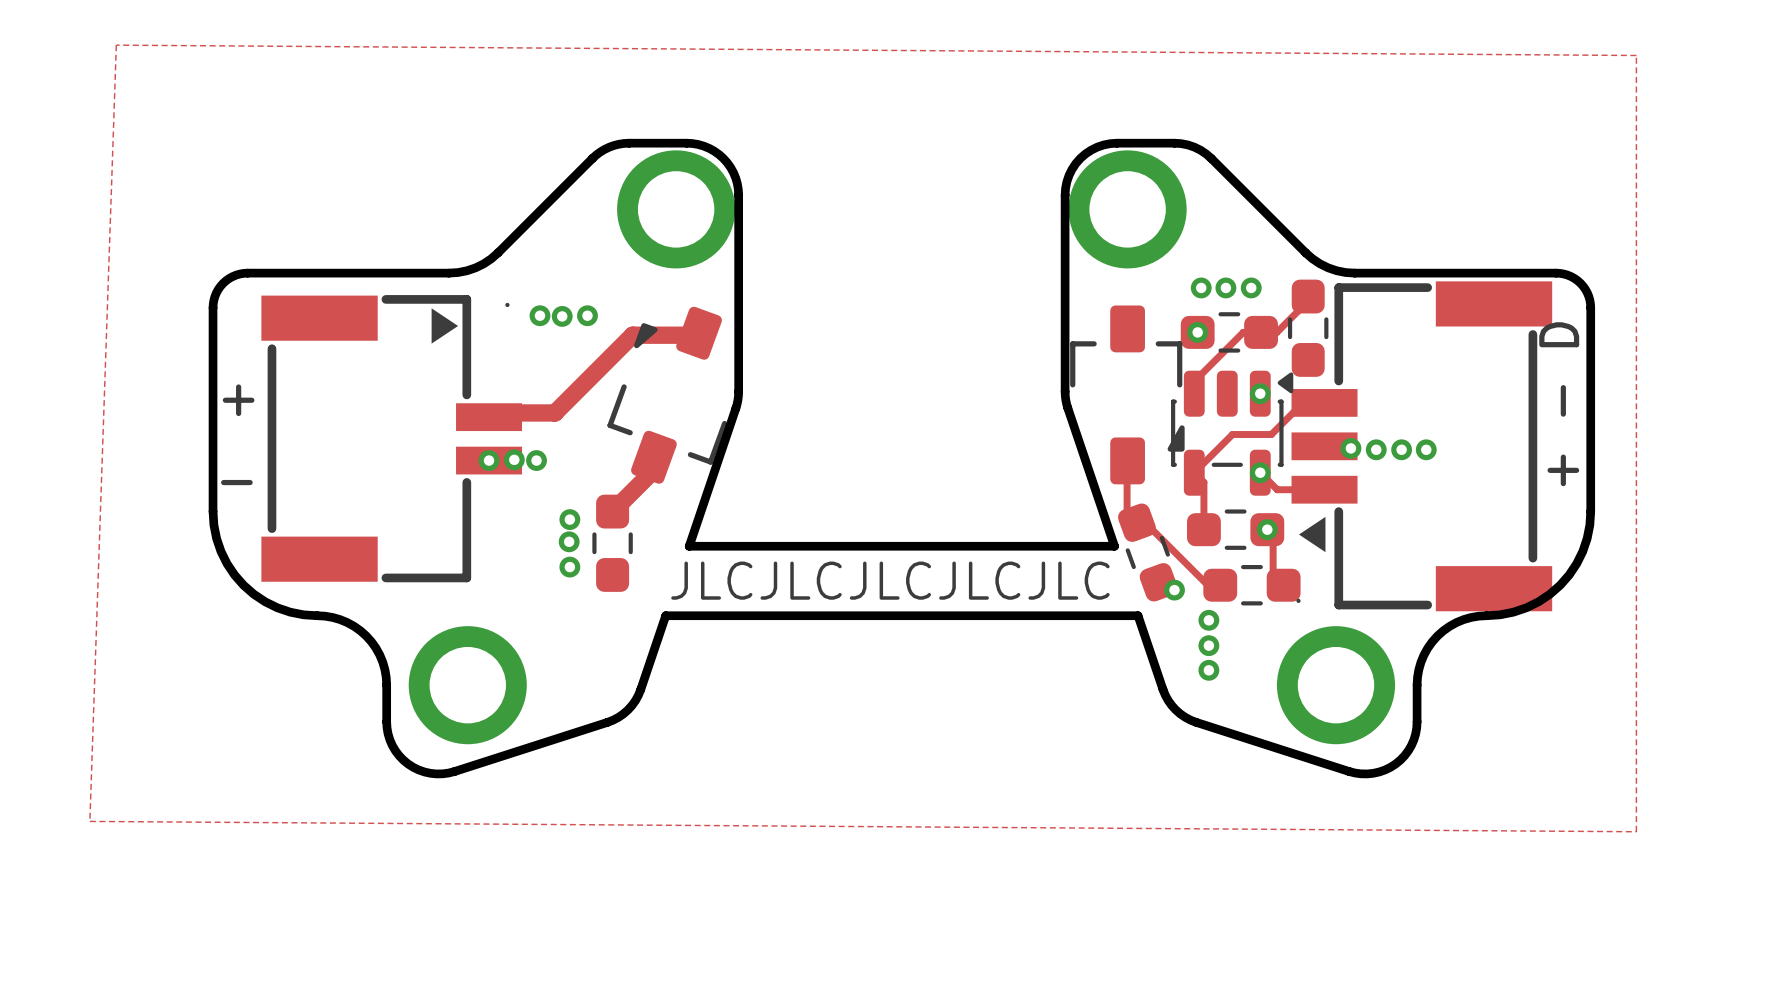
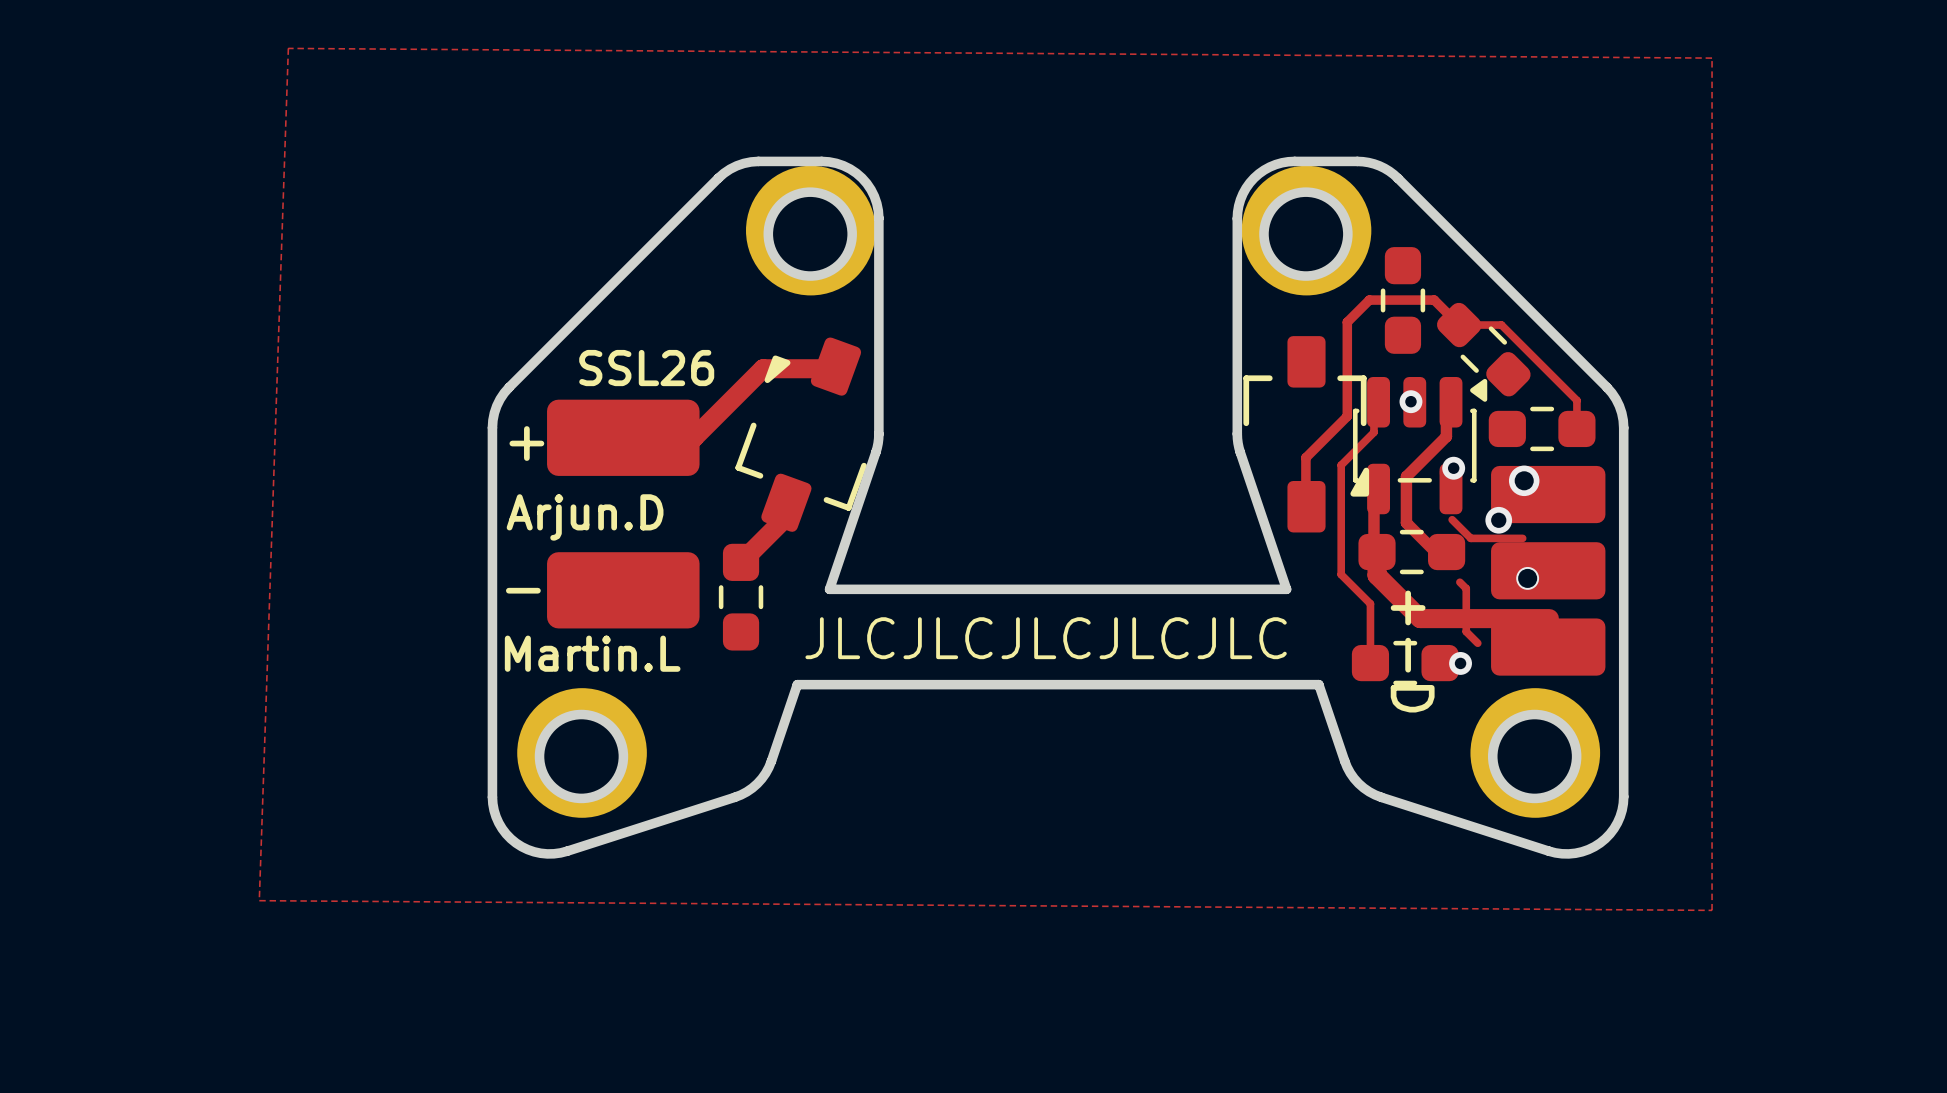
zone outline: (116, 45) (89, 821) (1636, 831) (1636, 55) (116, 45) -> (288, 48) (259, 900) (1712, 910) (1712, 58) (288, 48)
board edge: (629, 143) (692, 143) (709, 148) (723, 158) (730, 167) (738, 189) (737, 399) (689, 546) (1114, 546) (1065, 399) (1065, 188) (1069, 175) (1075, 163) (1085, 153) (1097, 147) (1117, 143) (1174, 143) (1194, 147) (1206, 153) (1305, 252) (1328, 267) (1354, 273) (1559, 273) (1571, 276) (1580, 283) (1588, 296) (1590, 307) (1590, 511) (1589, 525) (1582, 551) (1569, 574) (1560, 585) (1538, 601) (1513, 612) (1463, 619) (1449, 626) (1437, 636) (1423, 655) (1418, 669) (1416, 727) (1411, 745) (1395, 763) (1373, 773) (1349, 771) (1185, 717) (1175, 709) (1165, 695) (1138, 615) (665, 615) (638, 695) (627, 709) (618, 717) (454, 771) (436, 773) (418, 769) (403, 760) (389, 739) (387, 727) (384, 669) (376, 648) (366, 636) (354, 626) (340, 619) (290, 612) (265, 601) (243, 585) (226, 563) (220, 551) (216, 538) (213, 511) (213, 307) (214, 296) (226, 280) (243, 273) (449, 273) (475, 267) (498, 252) (596, 155) (614, 145) (629, 143) -> (758, 161) (736, 165) (718, 178) (509, 387) (496, 405) (492, 427) (492, 797) (494, 810) (498, 822) (506, 834) (516, 843) (534, 851) (547, 853) (560, 852) (746, 791) (761, 778) (768, 767) (797, 684) (1318, 684) (1347, 767) (1358, 783) (1375, 794) (1555, 852) (1568, 853) (1582, 851) (1600, 843) (1610, 833) (1620, 816) (1623, 796) (1623, 427) (1621, 413) (1616, 399) (1606, 387) (1393, 174) (1379, 165) (1362, 161) (1281, 162) (1269, 166) (1254, 178) (1246, 188) (1238, 205) (1238, 443) (1286, 589) (829, 589) (878, 443) (878, 210) (874, 196) (866, 183) (856, 173) (843, 165) (821, 161) (758, 161)
round board edge: none -> [763, 187, 857, 281]
round board edge: none -> [1259, 187, 1353, 281]
via: (1201, 287) -> none
via: (1225, 287) -> none
via: (1251, 287) -> none
track: (1307, 301) (1276, 332) (1243, 332) (1194, 381) (1194, 393) -> none
via: (539, 315) -> none
via: (587, 315) -> none
via: (562, 316) -> none
part rotation: 0° (1308, 328) -> 45° counterclockwise (1483, 349)
via: (1197, 332) -> none
part rotation: 0° (1229, 332) -> 90° clockwise (1402, 300)
part position: (1229, 332) -> (1402, 300)
text: none -> SSL26 (646, 368)
track: none -> (1373, 402) (1373, 432) (1341, 465) (1341, 574) (1370, 603) (1370, 663)
via: none -> (1410, 401)
track: none -> (1446, 421) (1451, 416) (1451, 407) (1446, 402) (1446, 436) (1406, 476) (1406, 522) (1435, 552) (1446, 552)
part: none -> (1542, 428)
via: (1260, 393) -> none
text position: + (238, 400) -> + (526, 443)
track: (1324, 402) (1302, 402) (1271, 434) (1232, 434) (1194, 472) (1203, 482) (1203, 529) -> none
text: + - D (1559, 404) -> none
via: none -> (1453, 468)
part position: (1232, 433) -> (1420, 445)
via: none -> (1524, 480)
part: (391, 438) -> none
track: none -> (1373, 489) (1373, 549) (1377, 552) (1377, 575) (1420, 618) (1549, 618)
part: (1421, 446) -> none
via: (1350, 448) -> none
via: (1376, 449) -> none
via: (1401, 449) -> none
via: (1426, 449) -> none
via: (514, 459) -> none
via: (489, 460) -> none
via: (536, 460) -> none
track: (1127, 463) (1127, 512) (1136, 522) (1145, 522) (1207, 585) (1220, 585) -> (1305, 509) (1305, 457) (1347, 416) (1347, 322) (1369, 300) (1434, 300) (1459, 325) (1501, 325) (1576, 400) (1576, 428)
part: none -> (623, 514)
text: none -> Arjun.D (585, 517)
via: (1260, 472) -> none
via: none -> (1498, 520)
text position: - (236, 482) -> - (523, 590)
via: (569, 519) -> none
part: none -> (1548, 570)
via: none -> (1527, 578)
part position: (1235, 529) -> (1411, 552)
via: (1267, 529) -> none
via: (569, 541) -> none
part: (1147, 552) -> none
via: (569, 567) -> none
part position: (1251, 585) -> (1405, 663)
via: (1174, 590) -> none
text: none -> +-D (1412, 651)
text: none -> Martin.L (592, 653)
via: none -> (1460, 663)
via: (1208, 620) -> none
round board edge: none -> [534, 709, 629, 804]
via: (1208, 645) -> none
round board edge: none -> [1487, 709, 1582, 804]
via: (1208, 670) -> none

